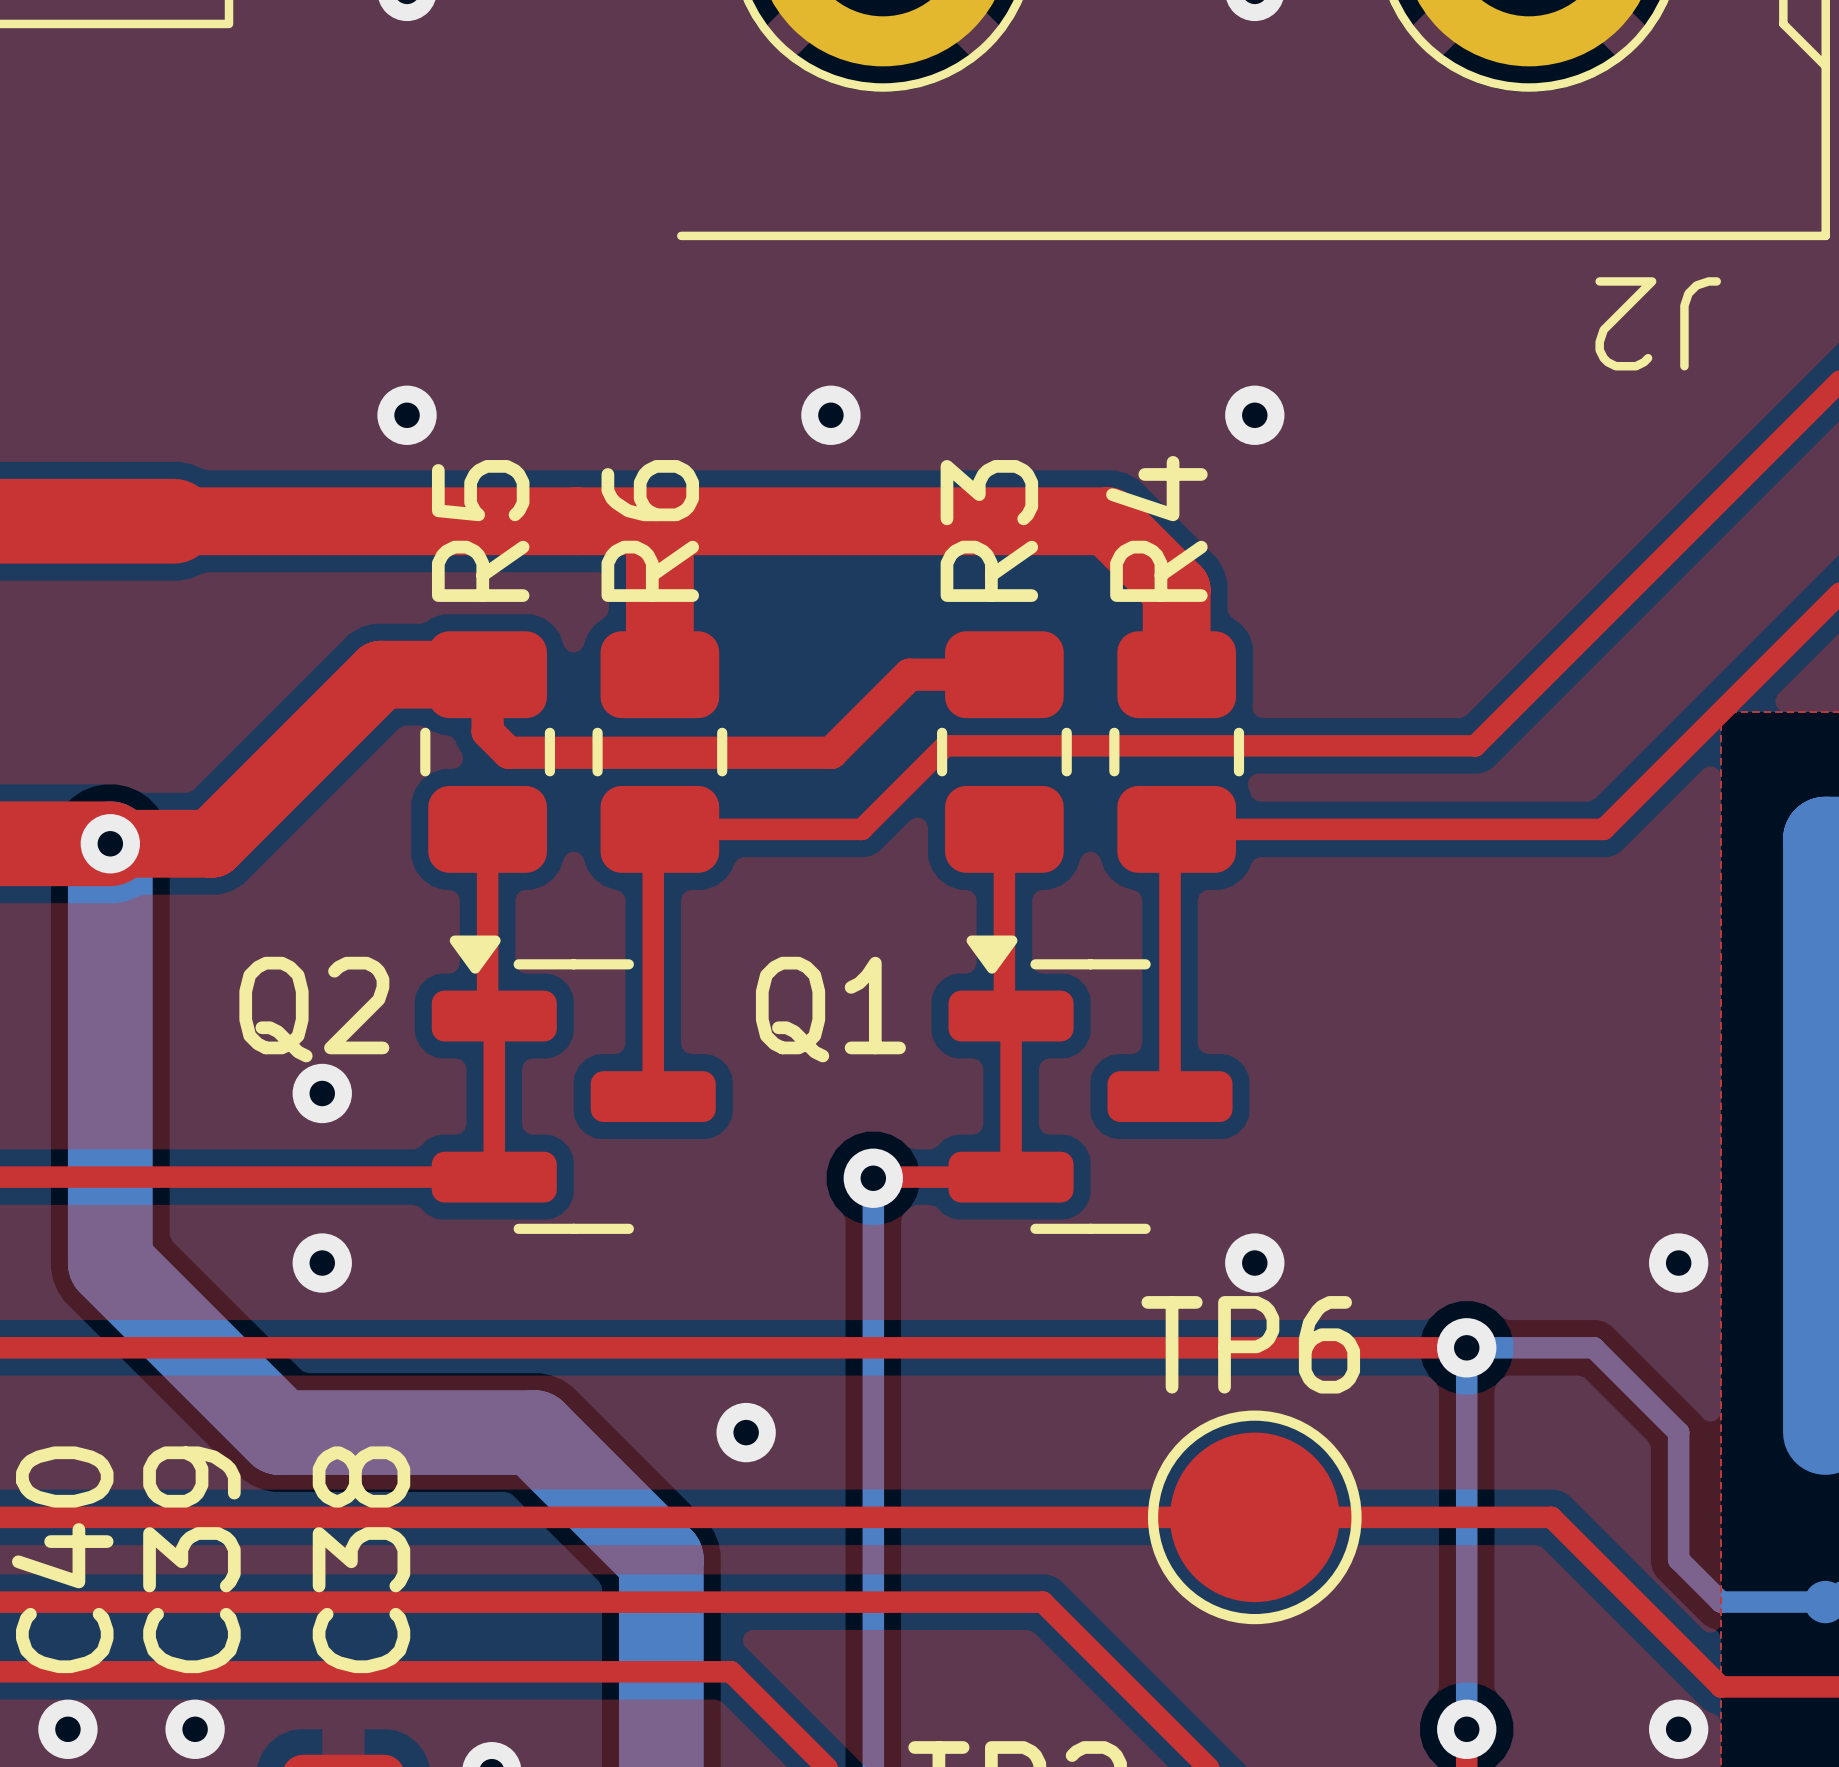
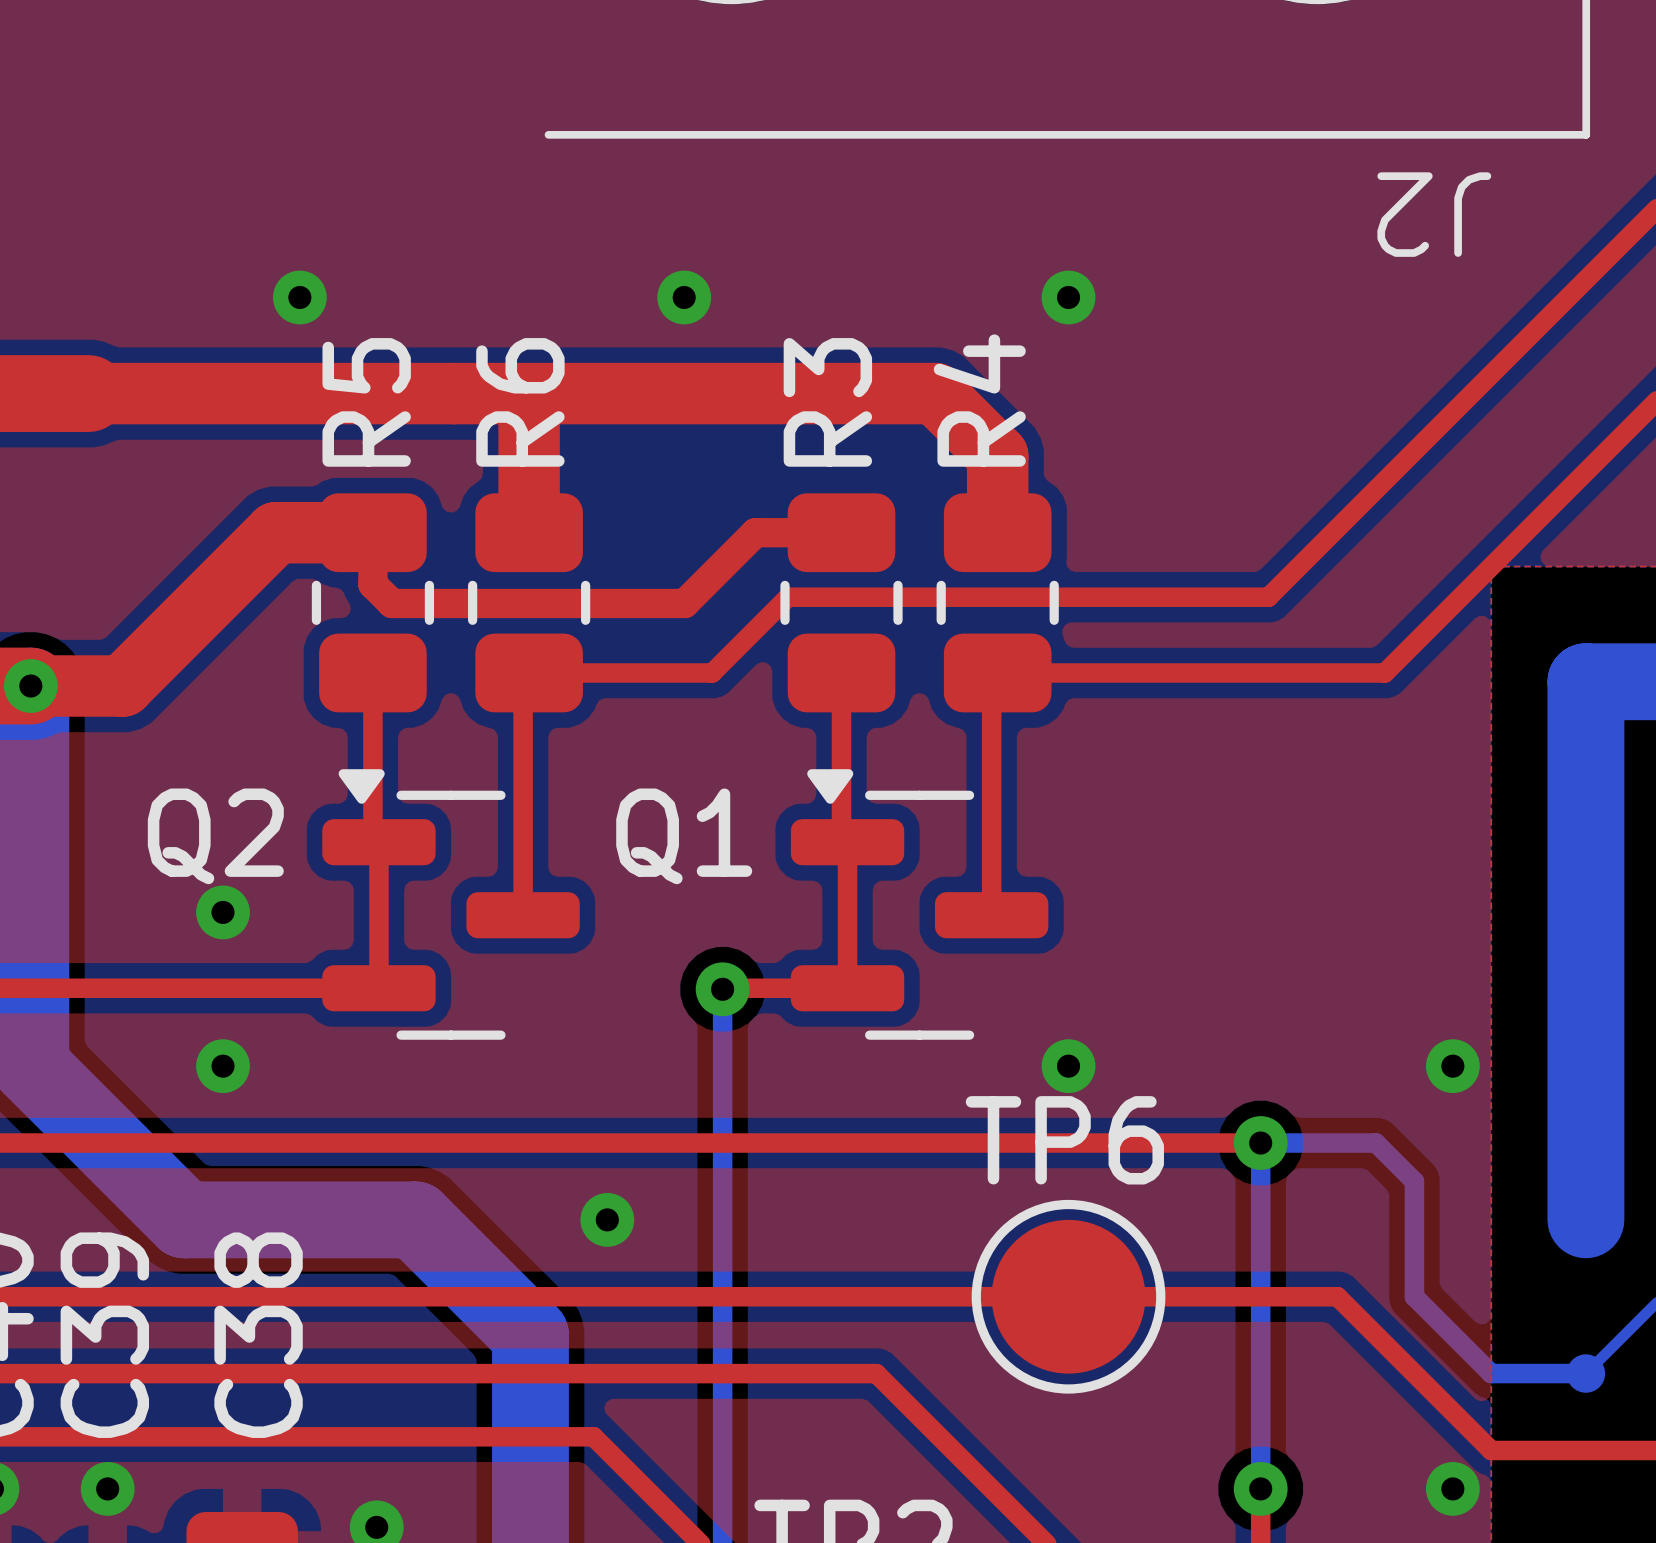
bottom track: (1636, 1390) (1678, 1432) (1678, 1559) -> (1414, 1181) (1414, 1296) (1452, 1335)

